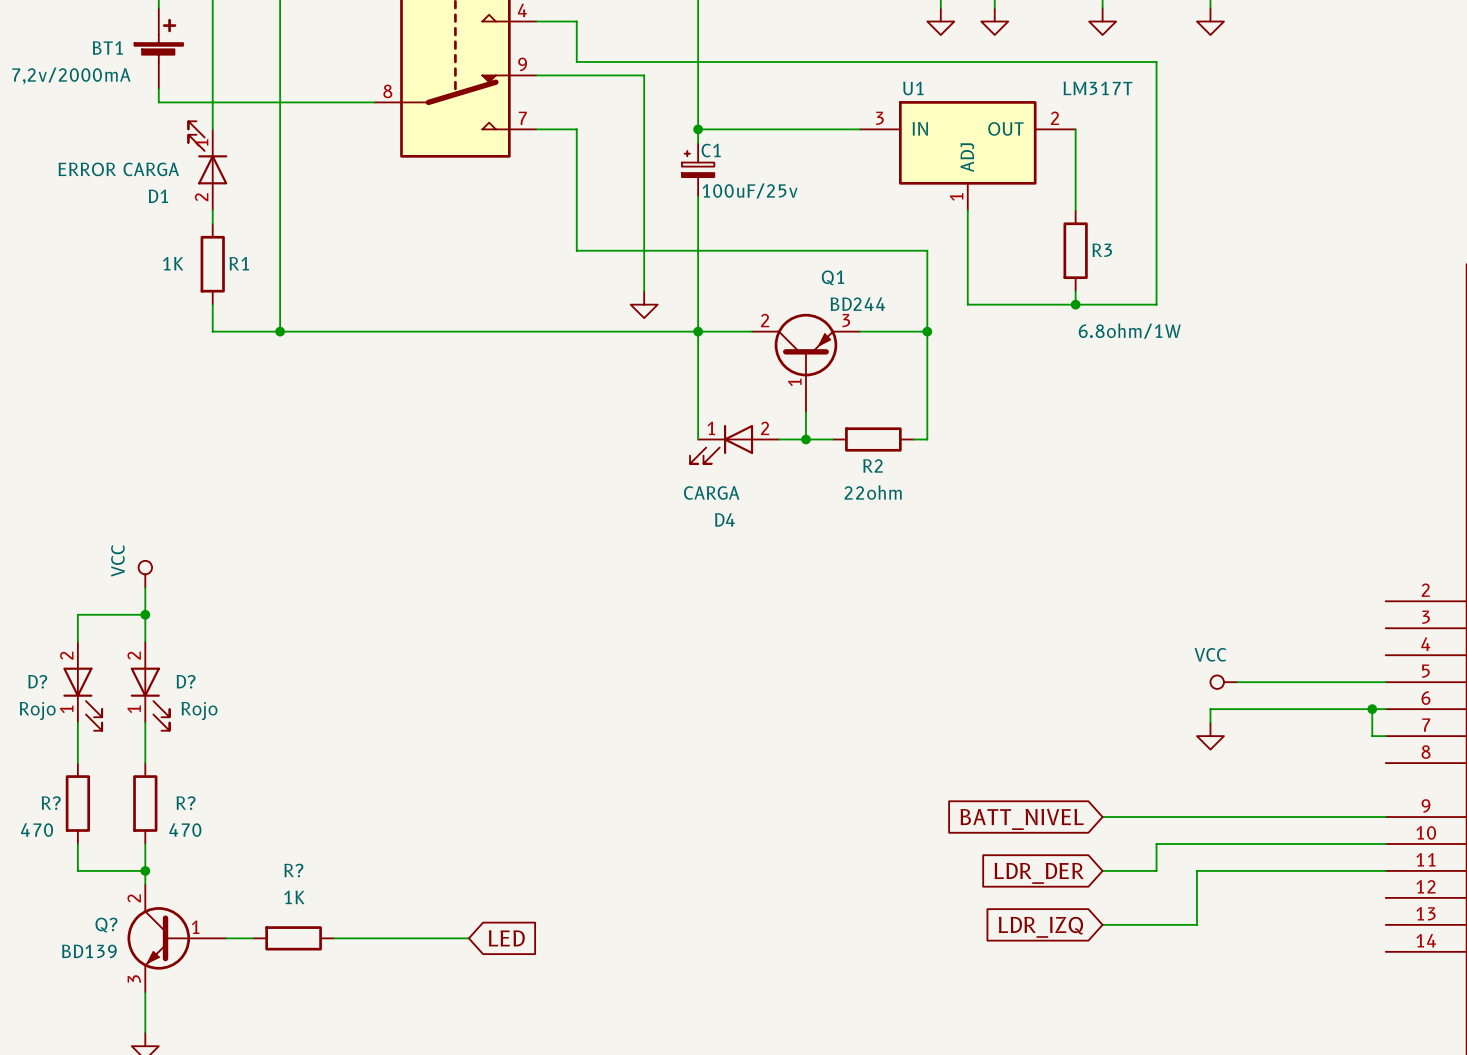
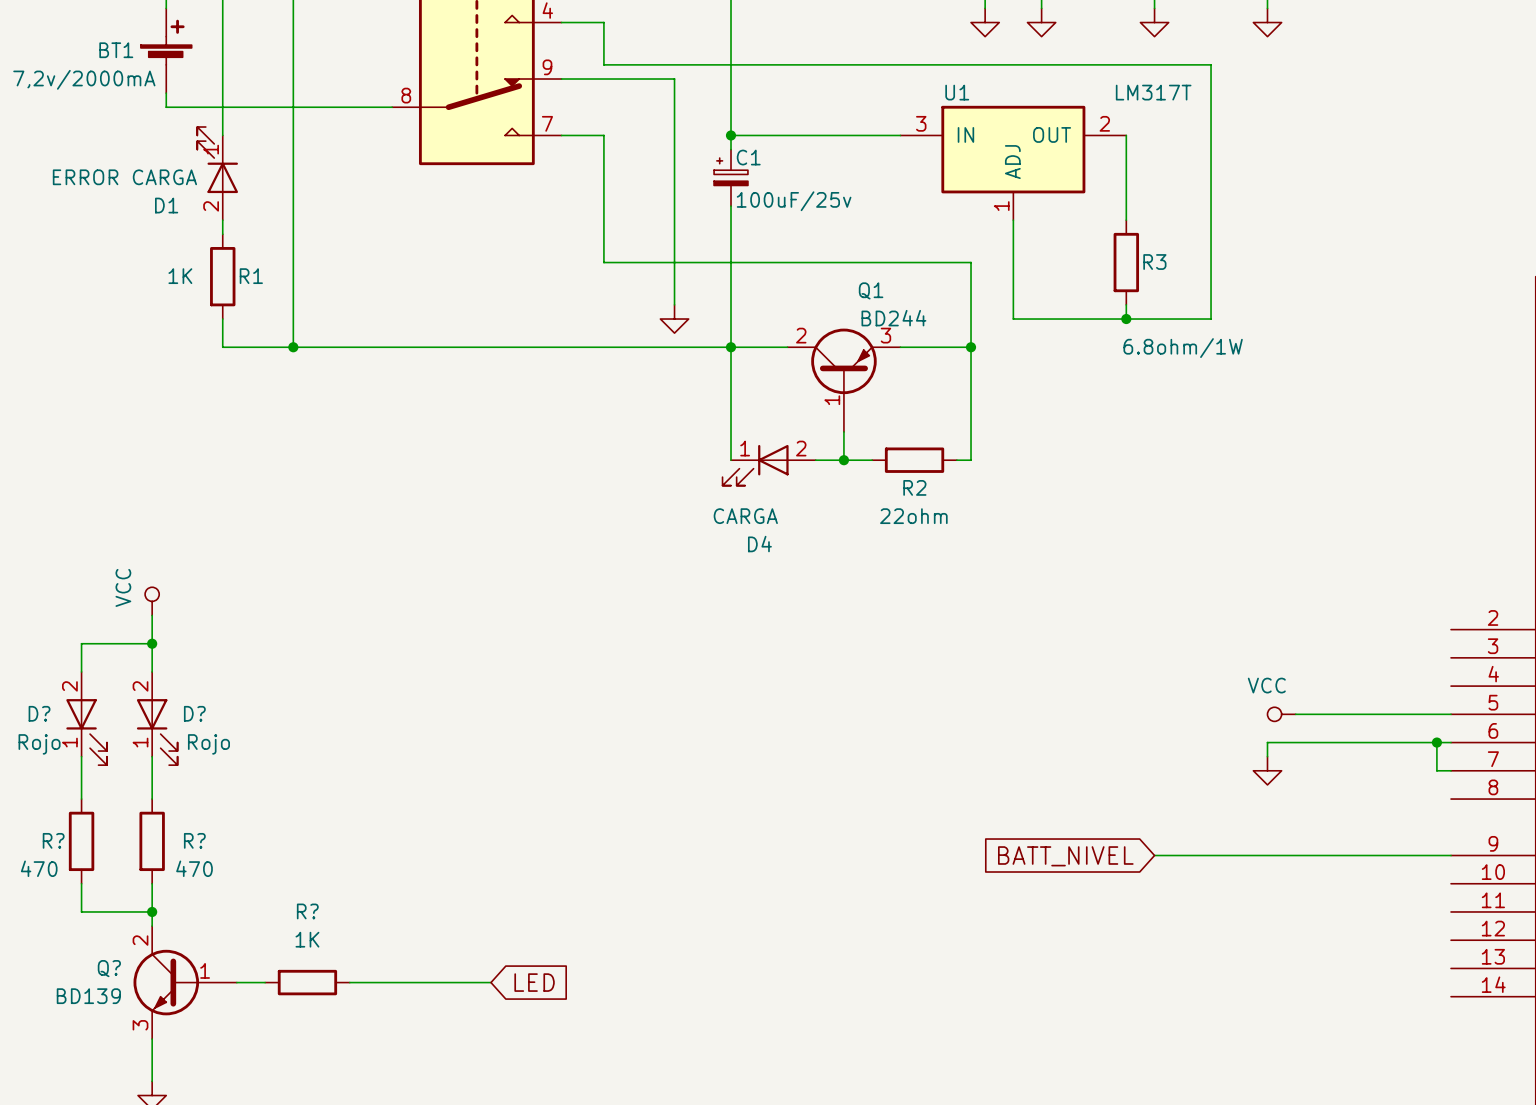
wire: (1385, 843) (1156, 843) (1156, 870) (1102, 870) -> none
wire: (1385, 870) (1196, 870) (1196, 924) (1102, 924) -> none
global label: LDR_DER (1039, 873) -> none
global label: LDR_IZQ (1040, 927) -> none

